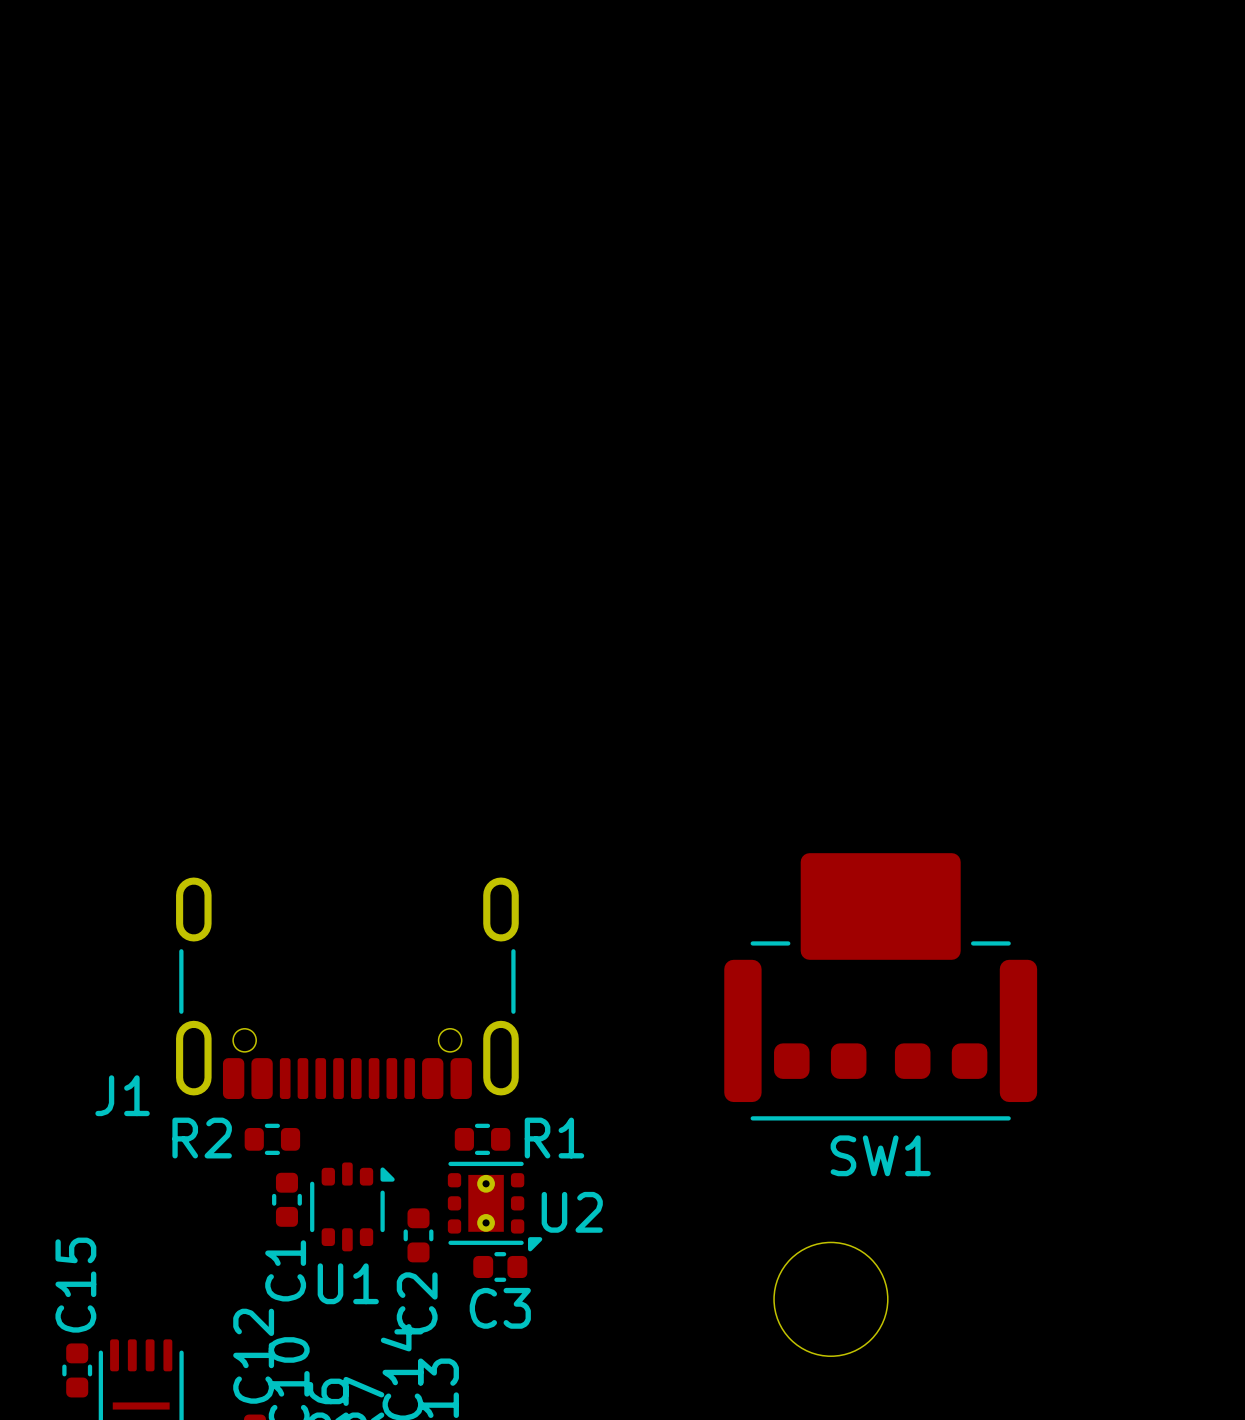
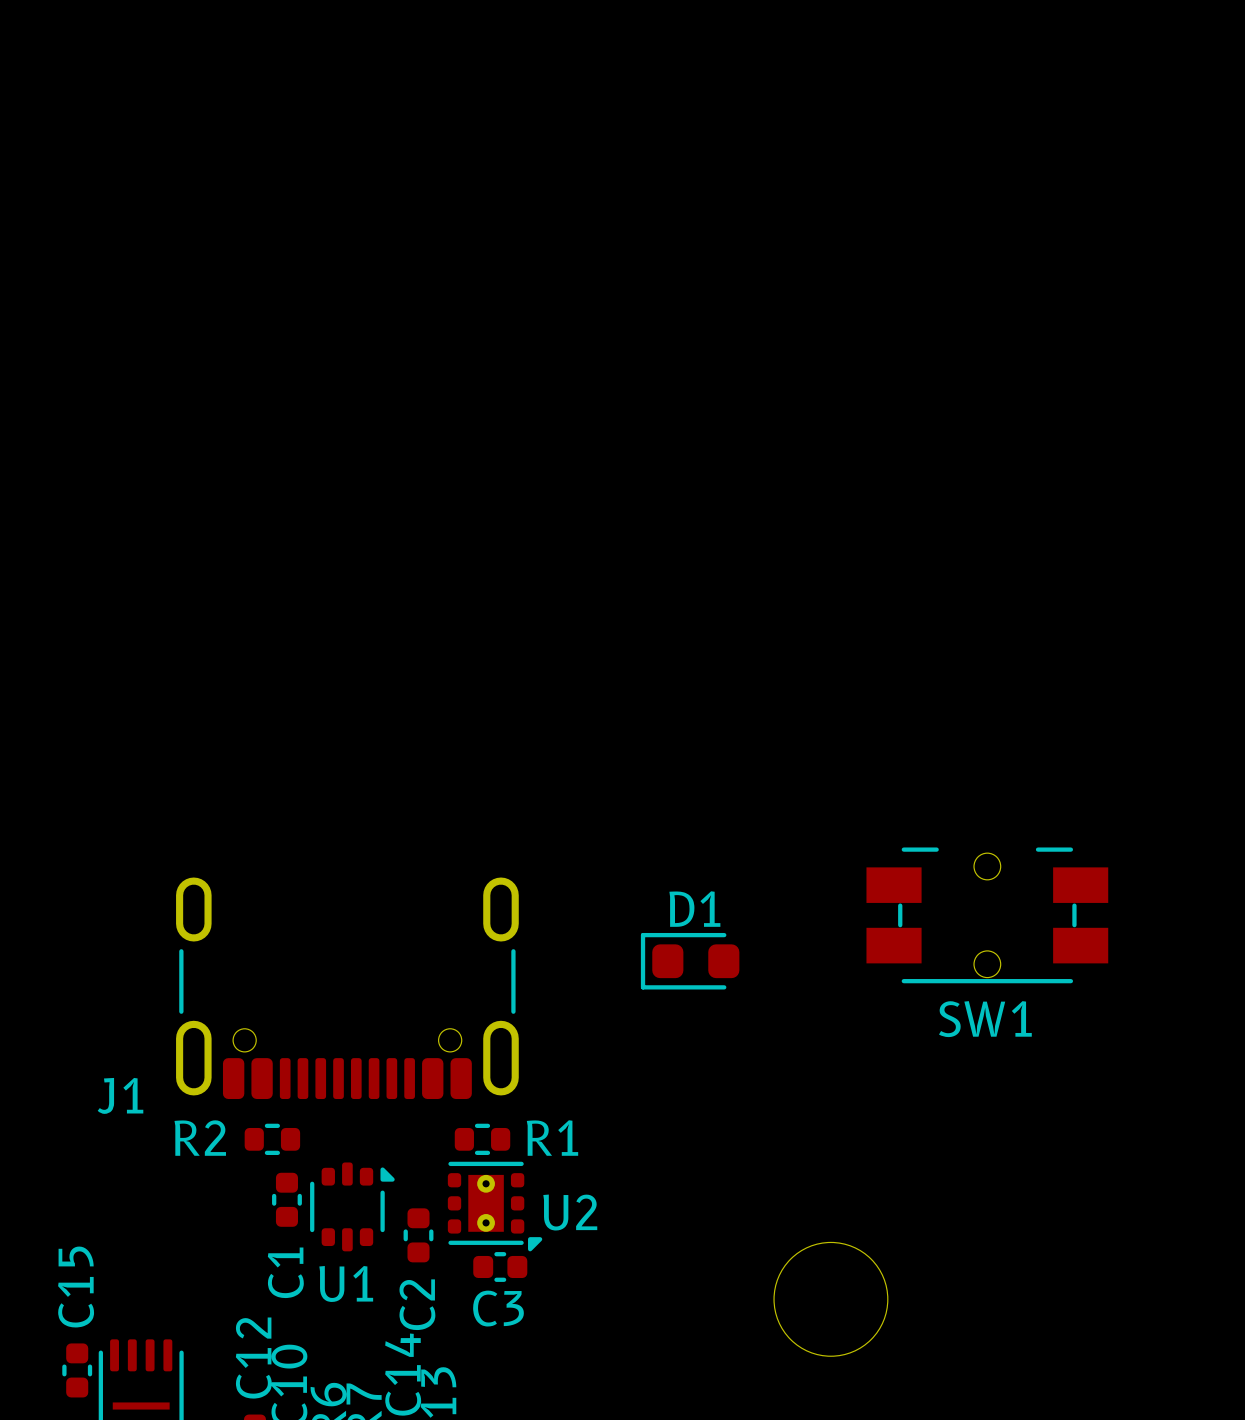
SW1 footprint: [724, 853, 1038, 1121] -> [866, 847, 1109, 984]
D1: none -> (690, 961)

